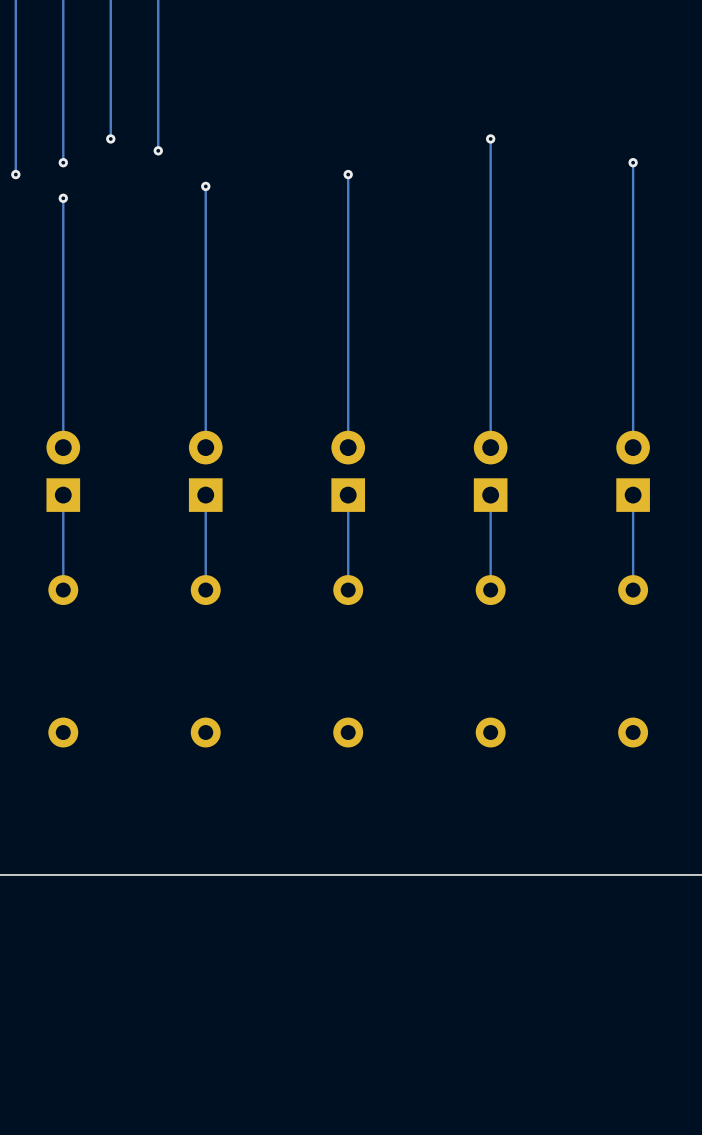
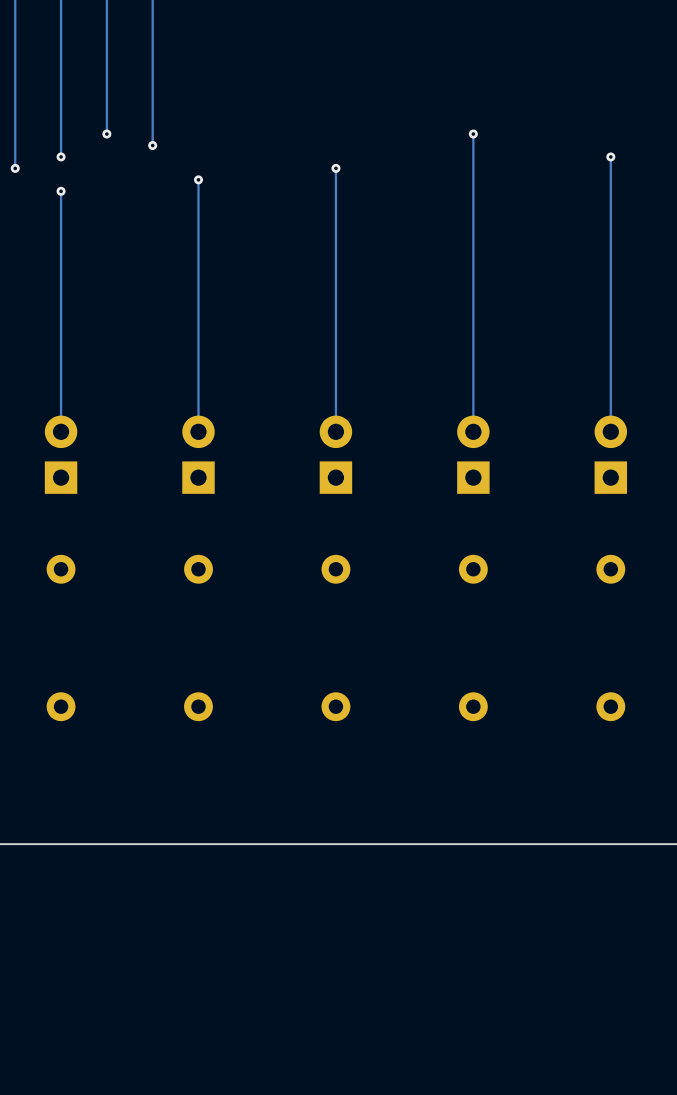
track: (63, 495) (63, 590) -> none
track: (205, 495) (205, 590) -> none
track: (348, 495) (348, 590) -> none
track: (490, 495) (490, 590) -> none
track: (633, 495) (633, 590) -> none

